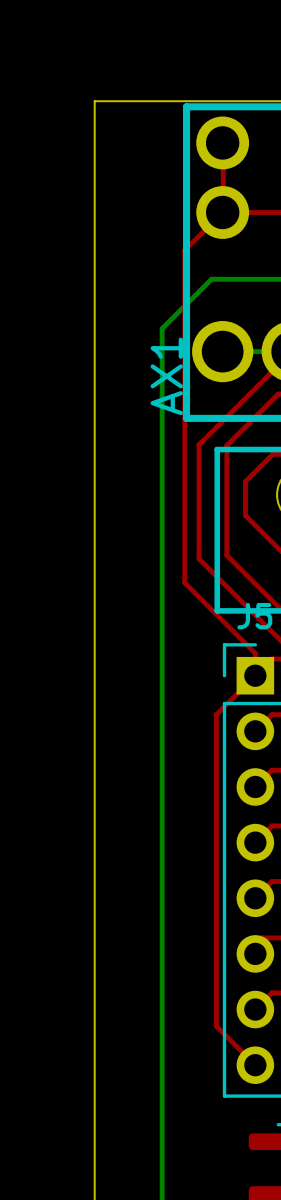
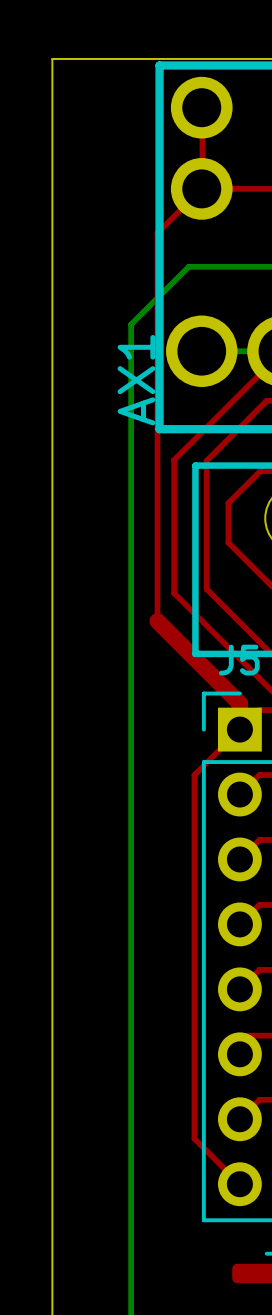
top track width: thin (184, 582) (255, 653) (255, 675) -> thick (157, 621) (239, 703) (239, 729)

